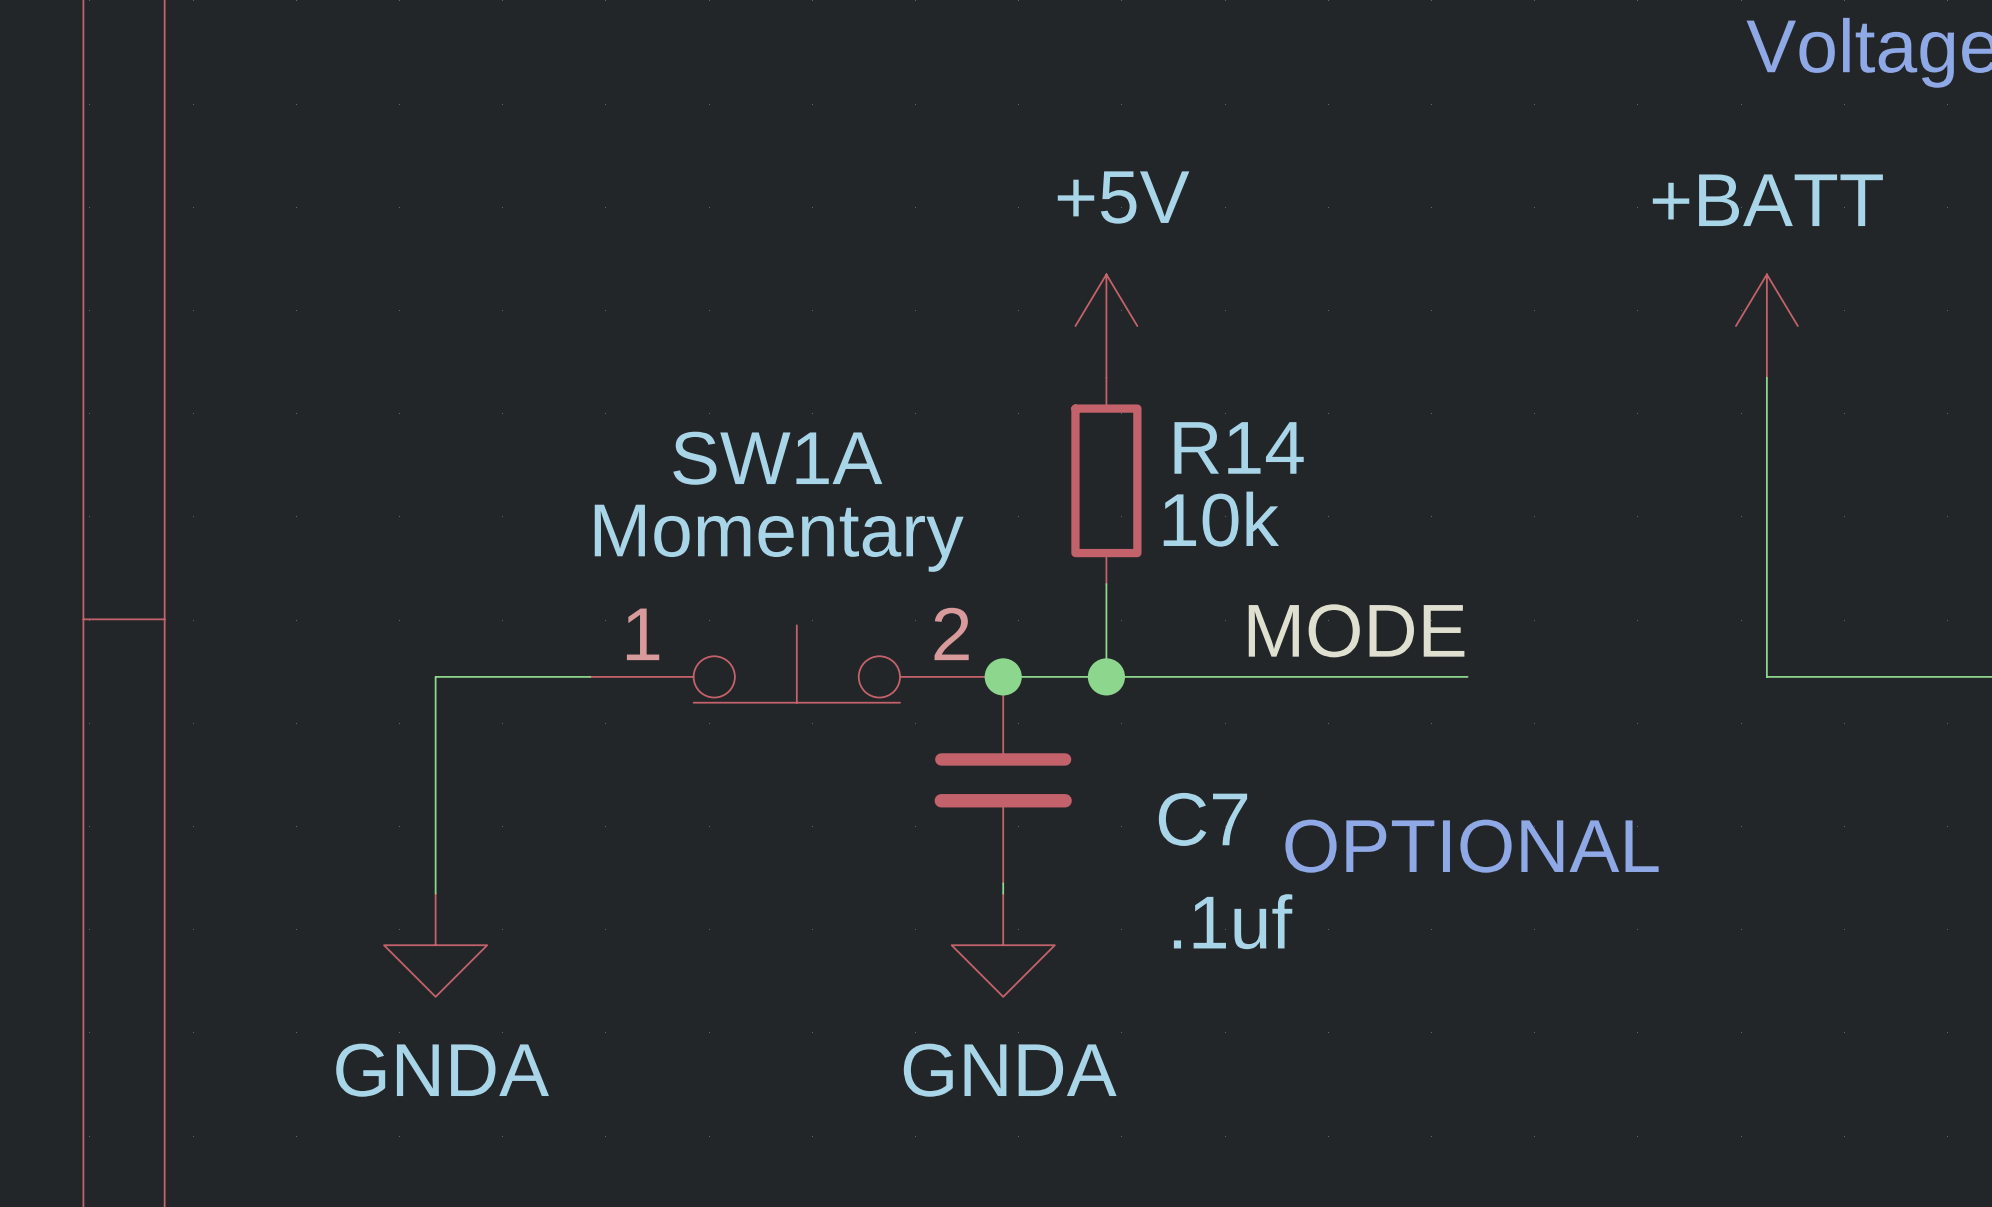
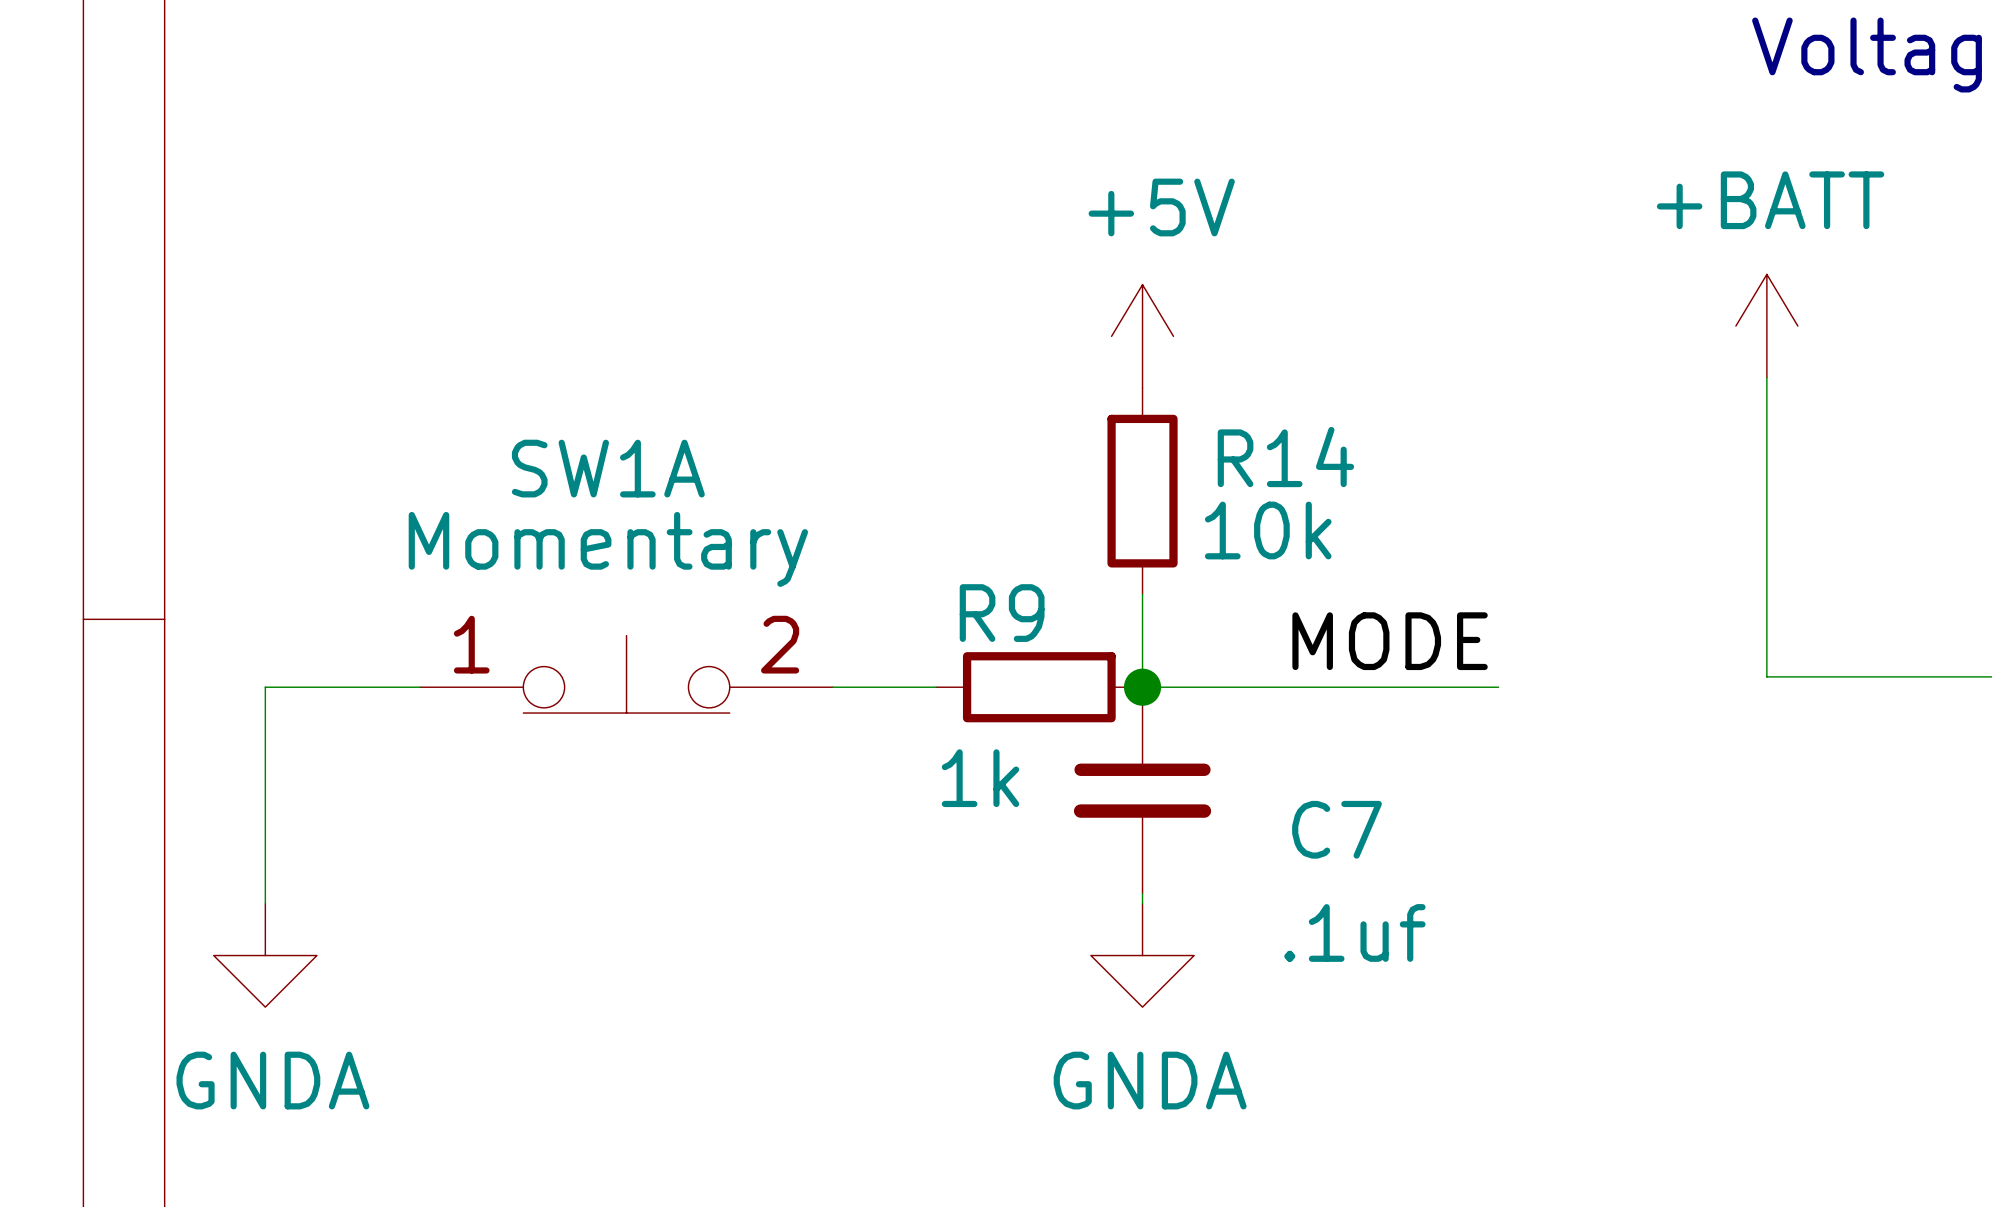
power symbol position: +5V (1106, 326) -> +5V (1142, 336)
R14 position: (1106, 480) -> (1142, 491)
wire: (1106, 584) (1106, 676) -> (1142, 594) (1142, 687)
label position: MODE (1356, 630) -> MODE (1390, 641)
SW1A position: (796, 664) -> (626, 674)
wire: (590, 676) (435, 676) (435, 893) -> (420, 687) (265, 687) (265, 903)
wire: (1003, 676) (1467, 676) -> none
junction: (1003, 676) -> none
junction position: (1106, 676) -> (1142, 687)
wire: none -> (832, 687) (936, 687)
R9: none -> 1k (1039, 687)
wire: none -> (1137, 687) (1498, 687)
C7 position: (1003, 780) -> (1142, 790)
text: OPTIONAL (1472, 846) -> none
wire: (1003, 883) (1003, 893) -> (1142, 893) (1142, 903)
power symbol position: GNDA (435, 945) -> GNDA (265, 955)
power symbol position: GNDA (1003, 945) -> GNDA (1142, 955)

